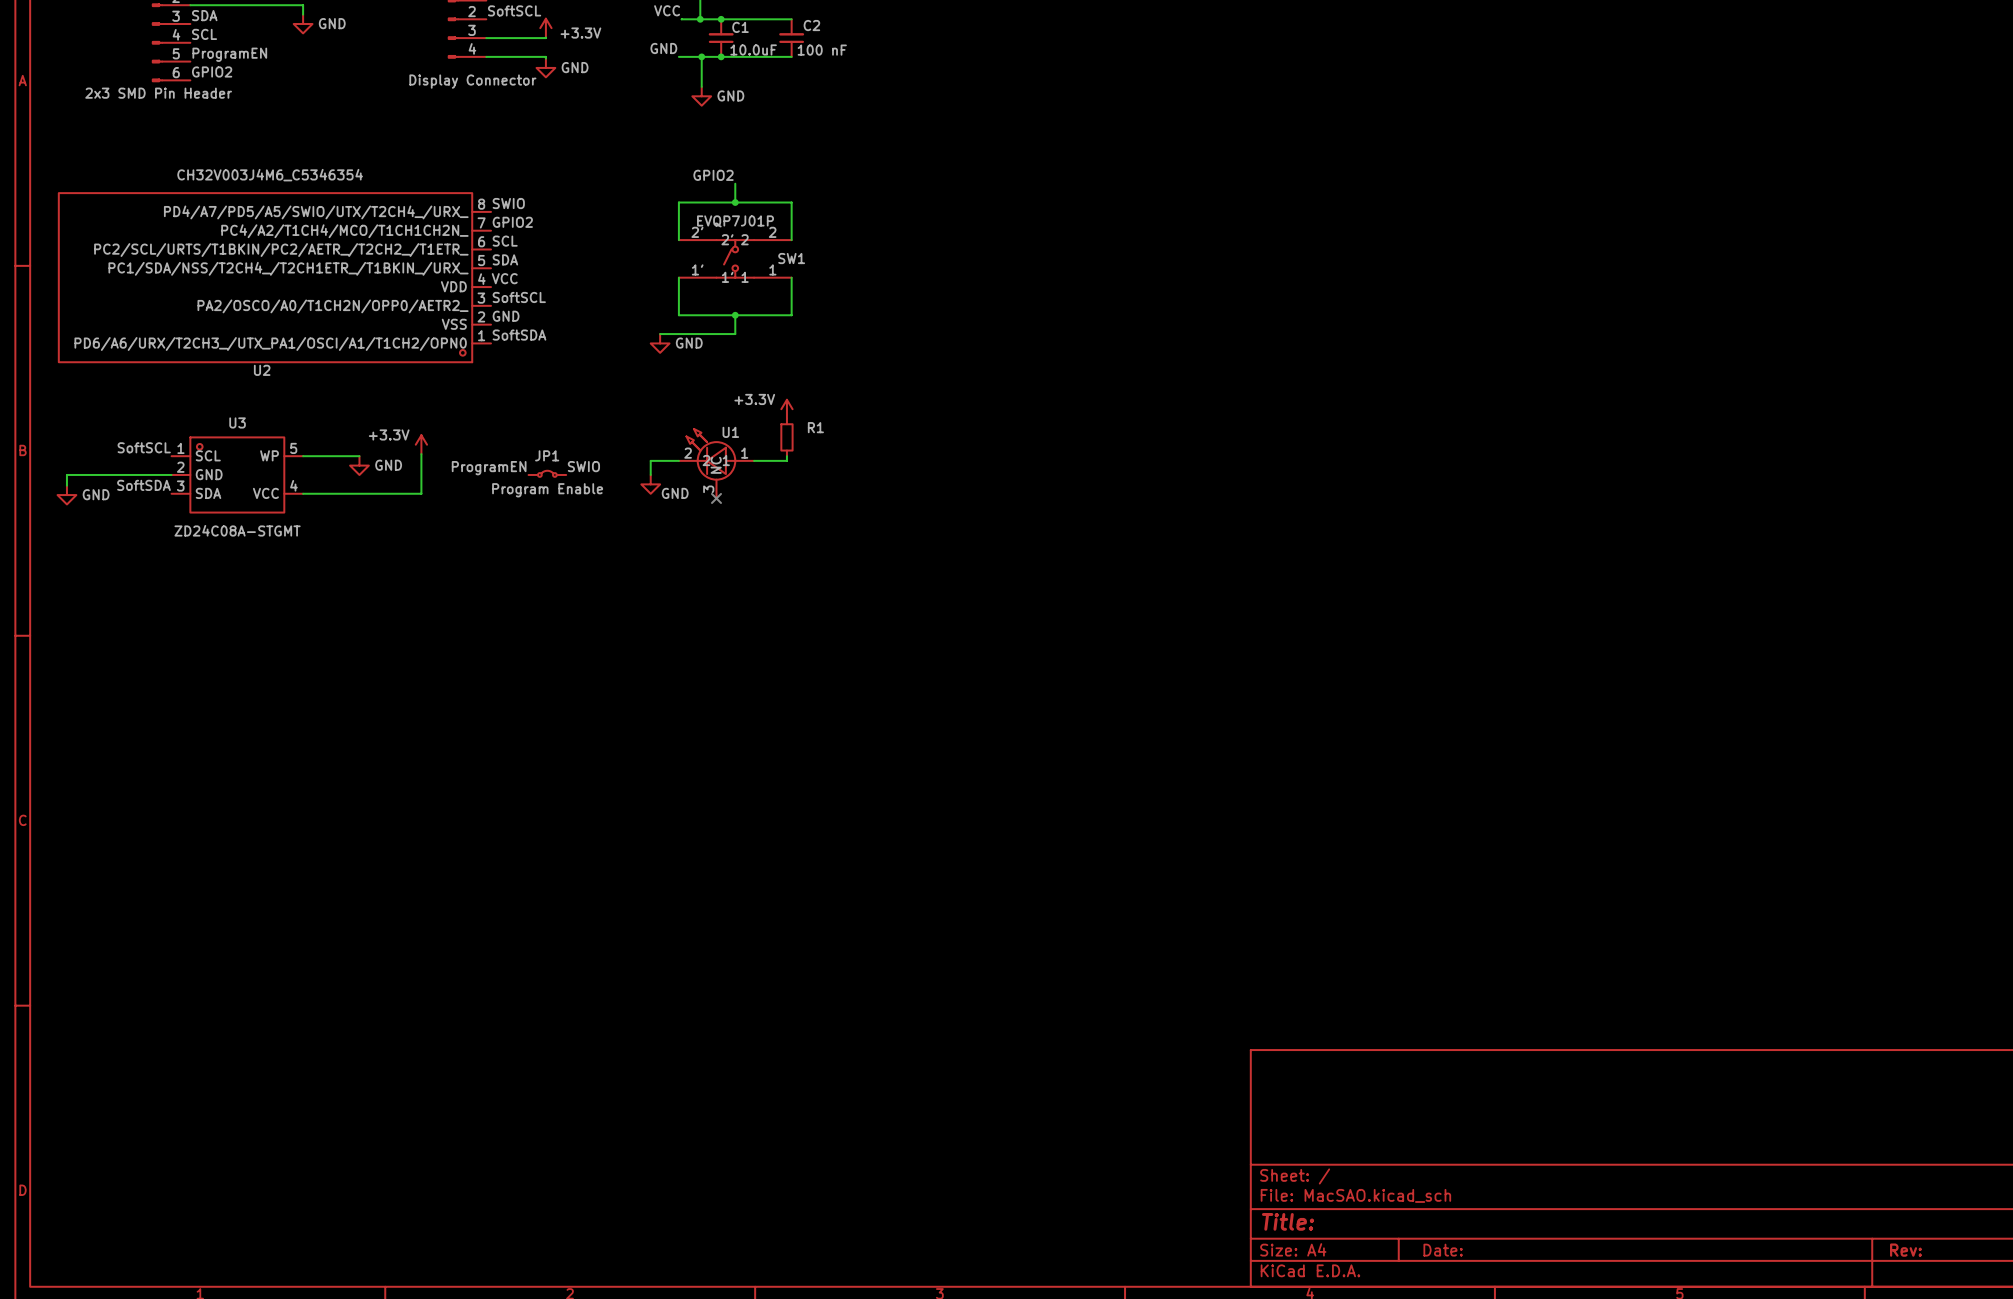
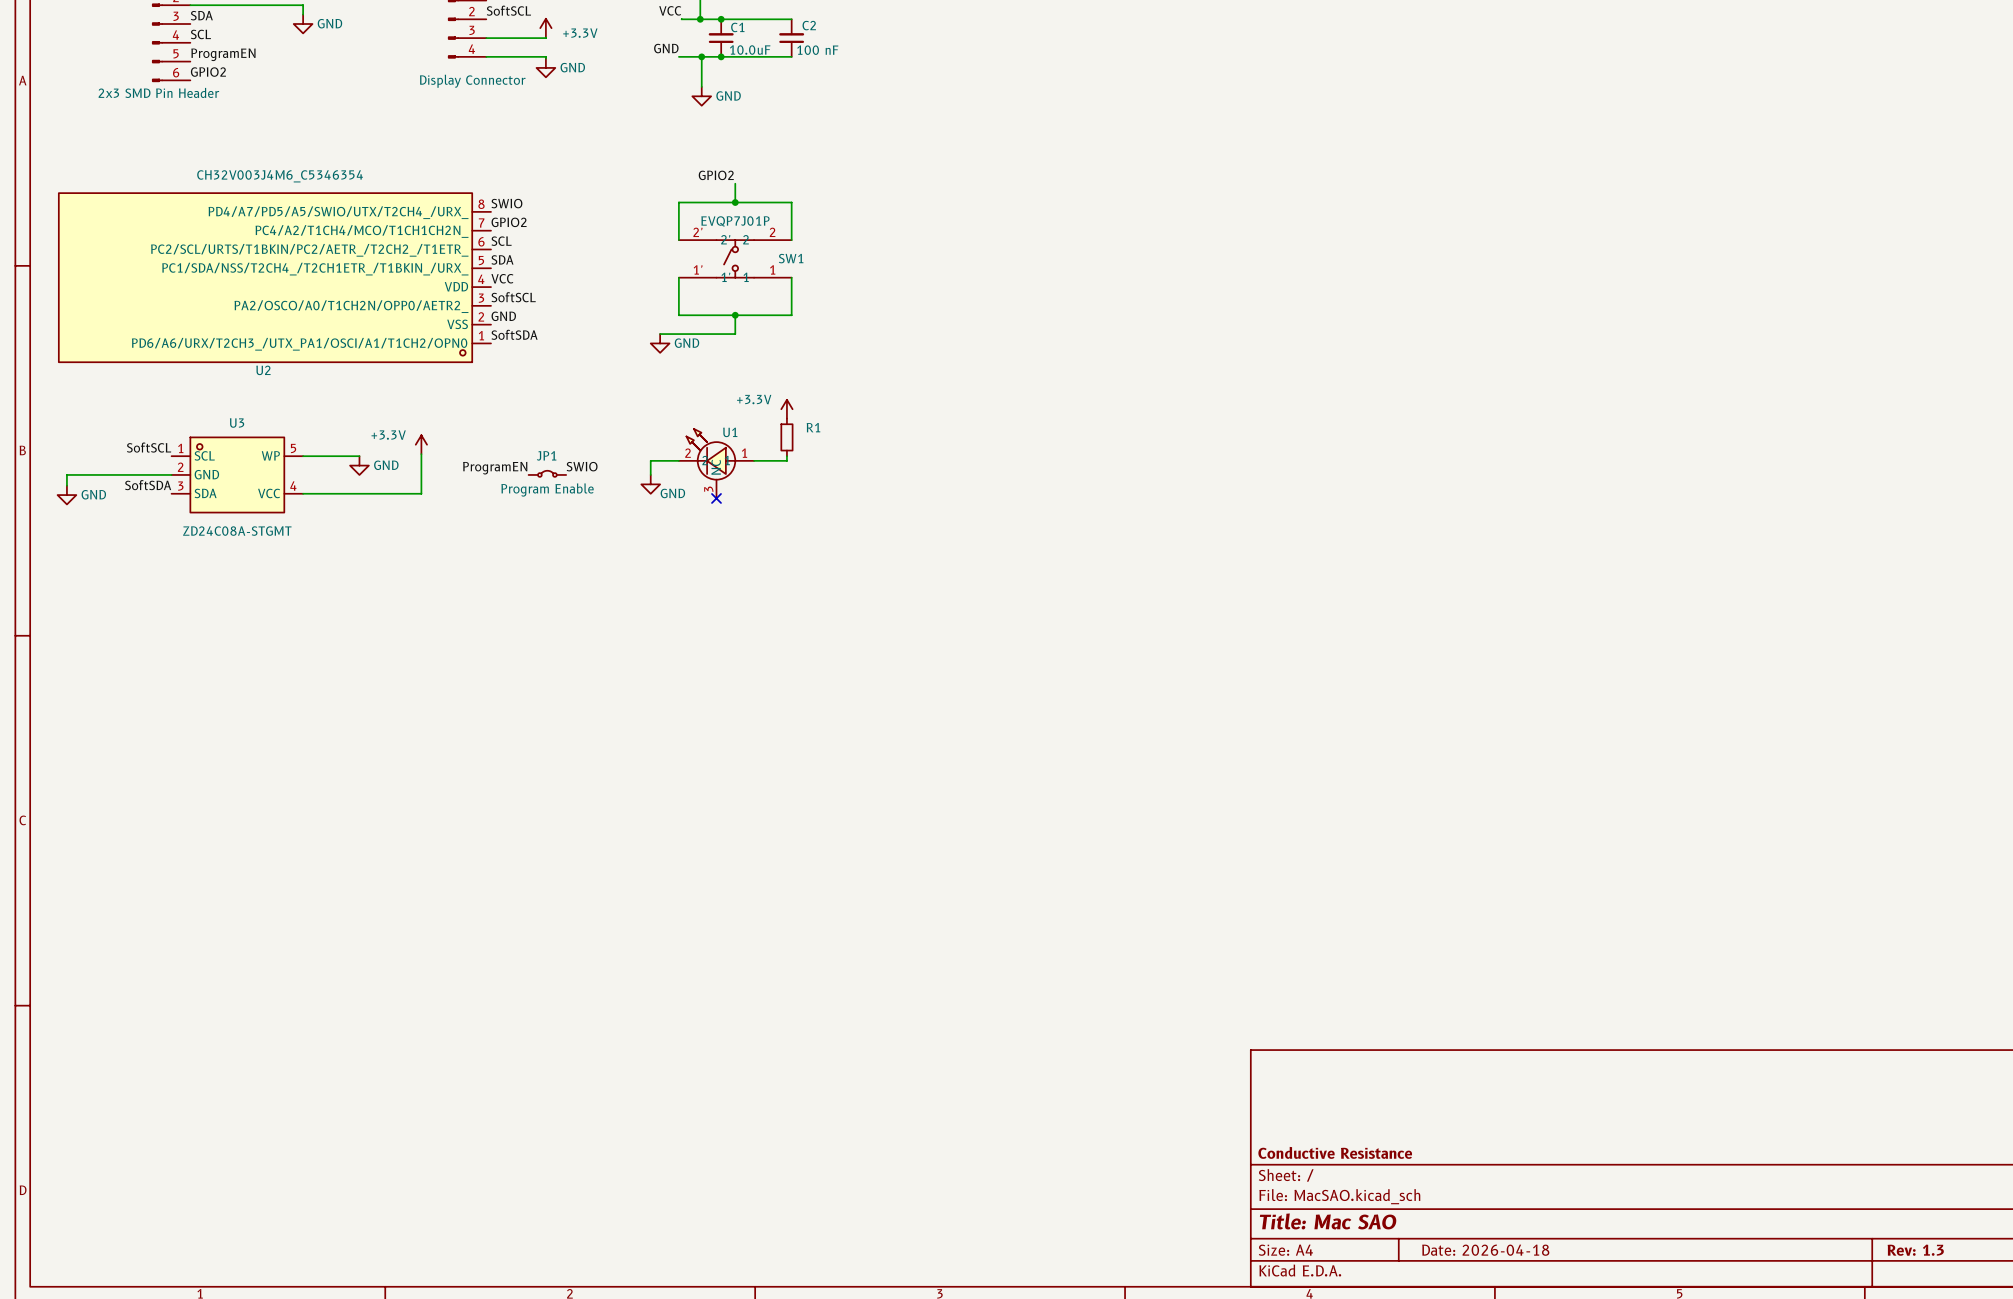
title block: none -> Conductive Resistance (1335, 1152)
title block: Title: (1288, 1221) -> Title: Mac SAO (1328, 1221)
title block: Date: (1443, 1250) -> Date: 2026-04-18 (1485, 1250)
title block: Rev: (1905, 1250) -> Rev: 1.3 (1915, 1250)

